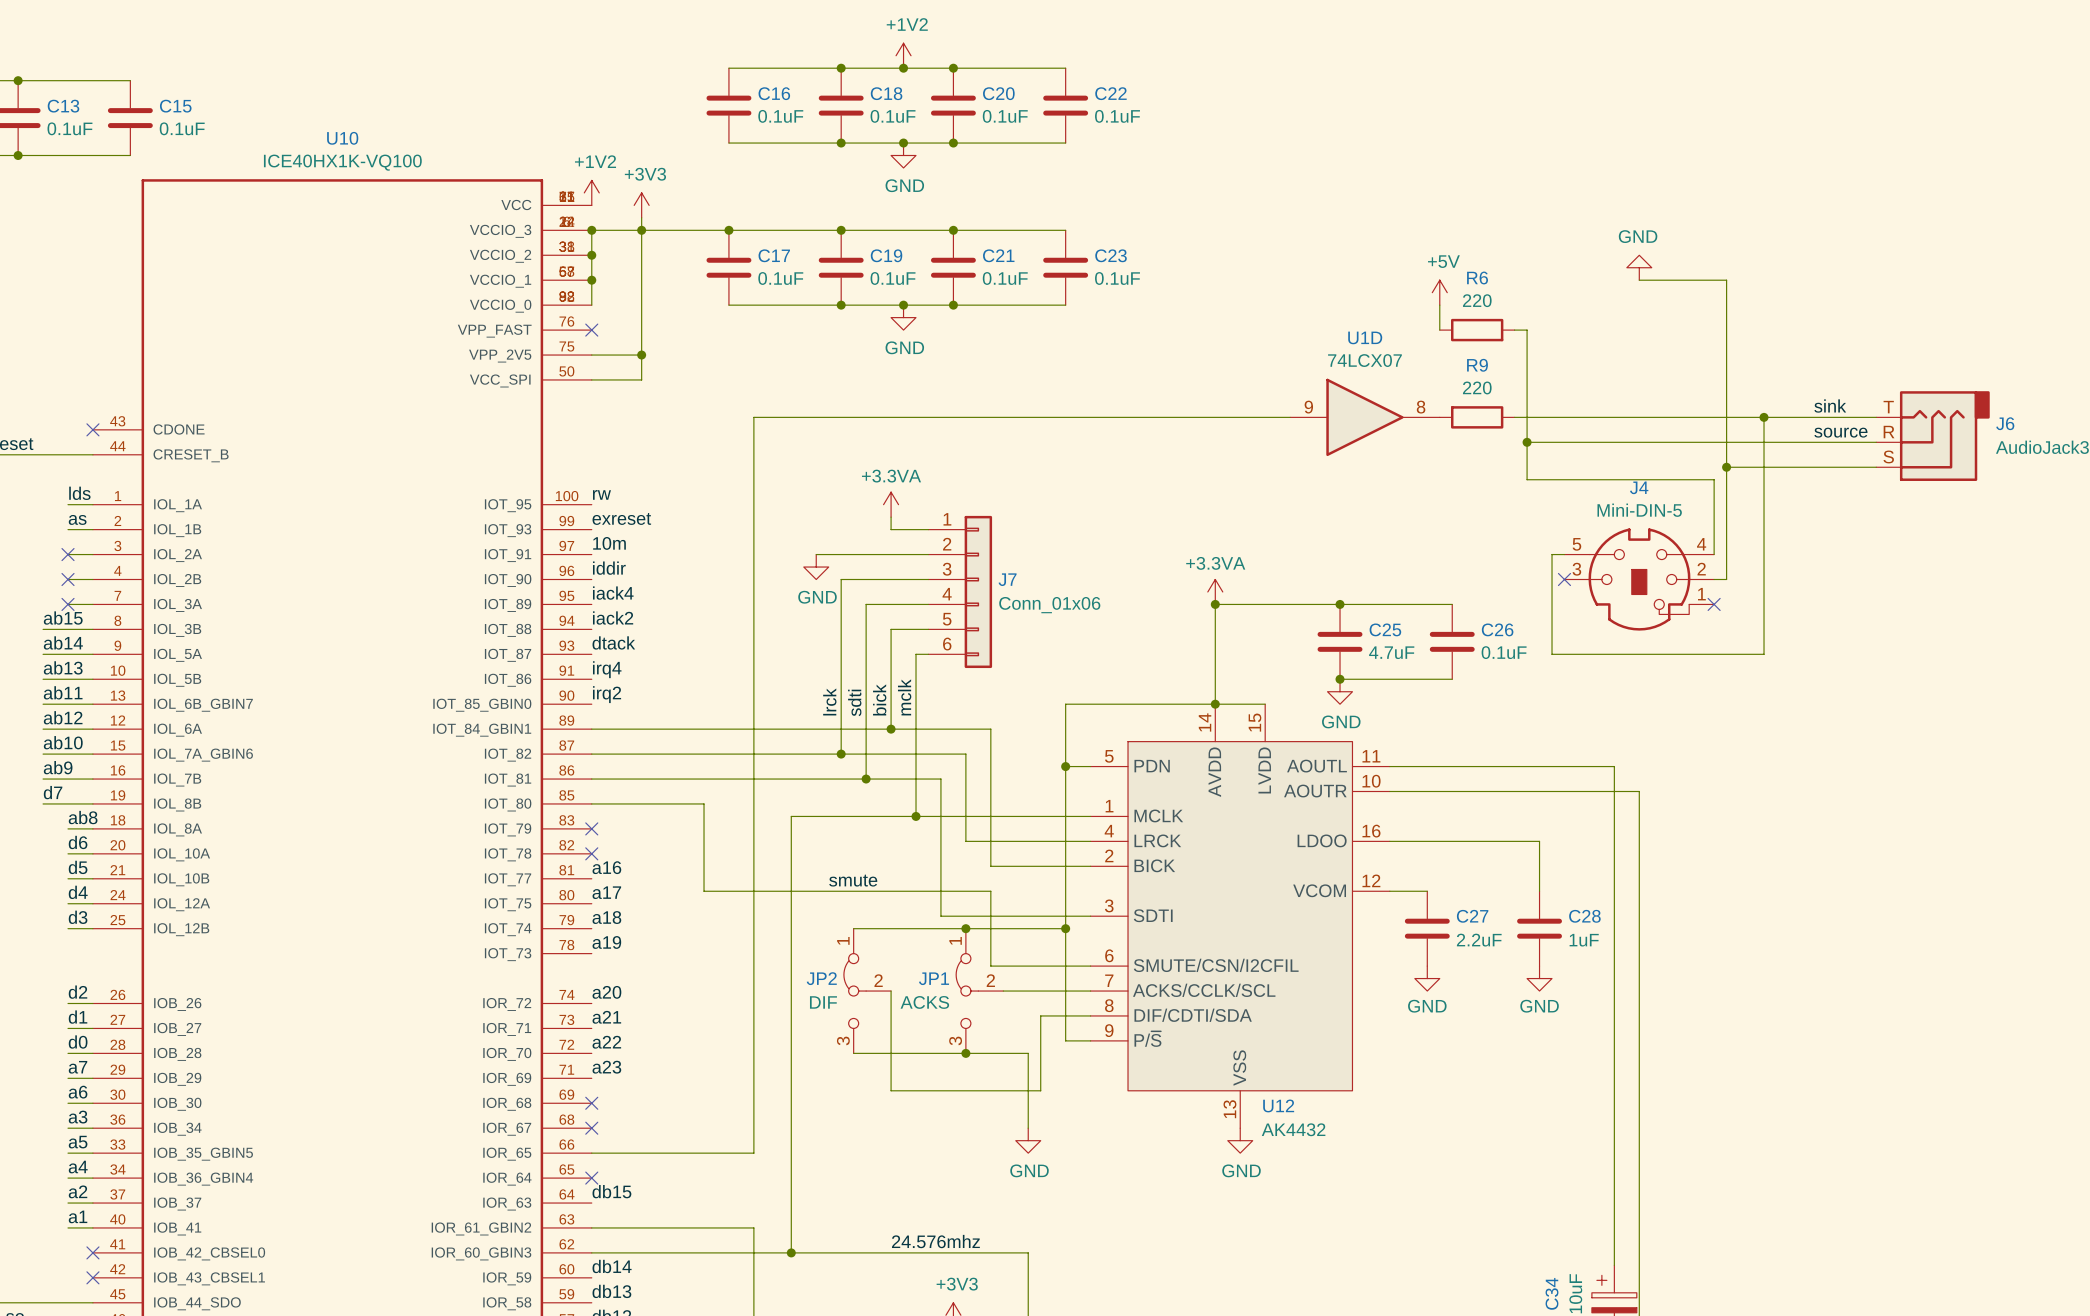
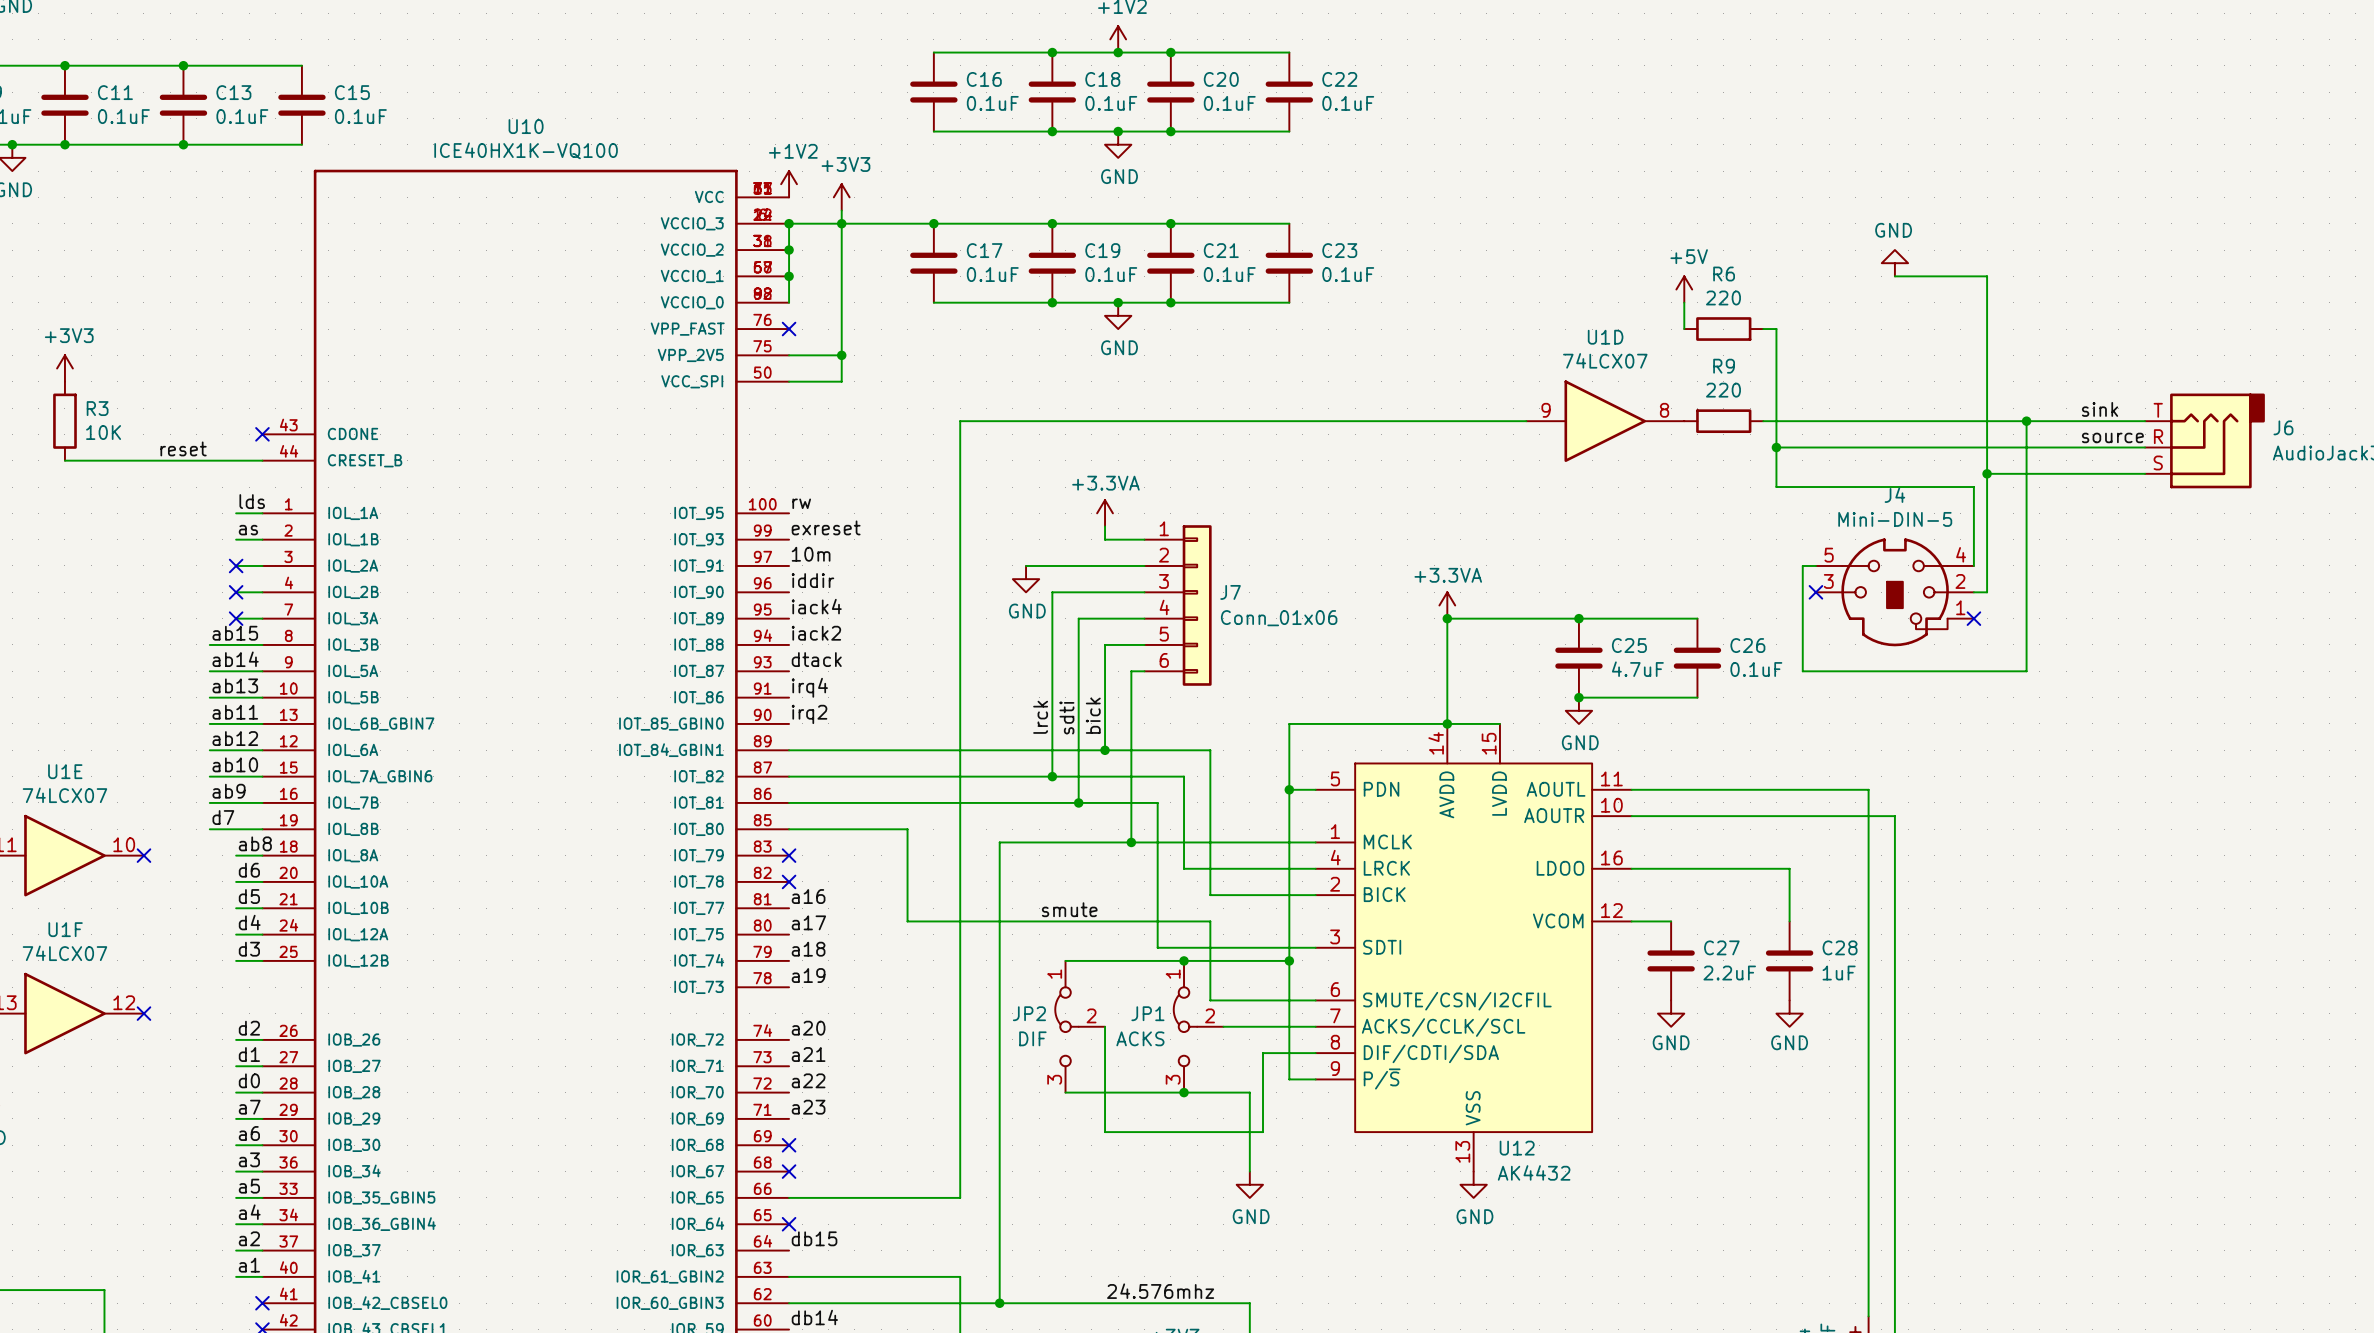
label: mclk (904, 697) -> none

